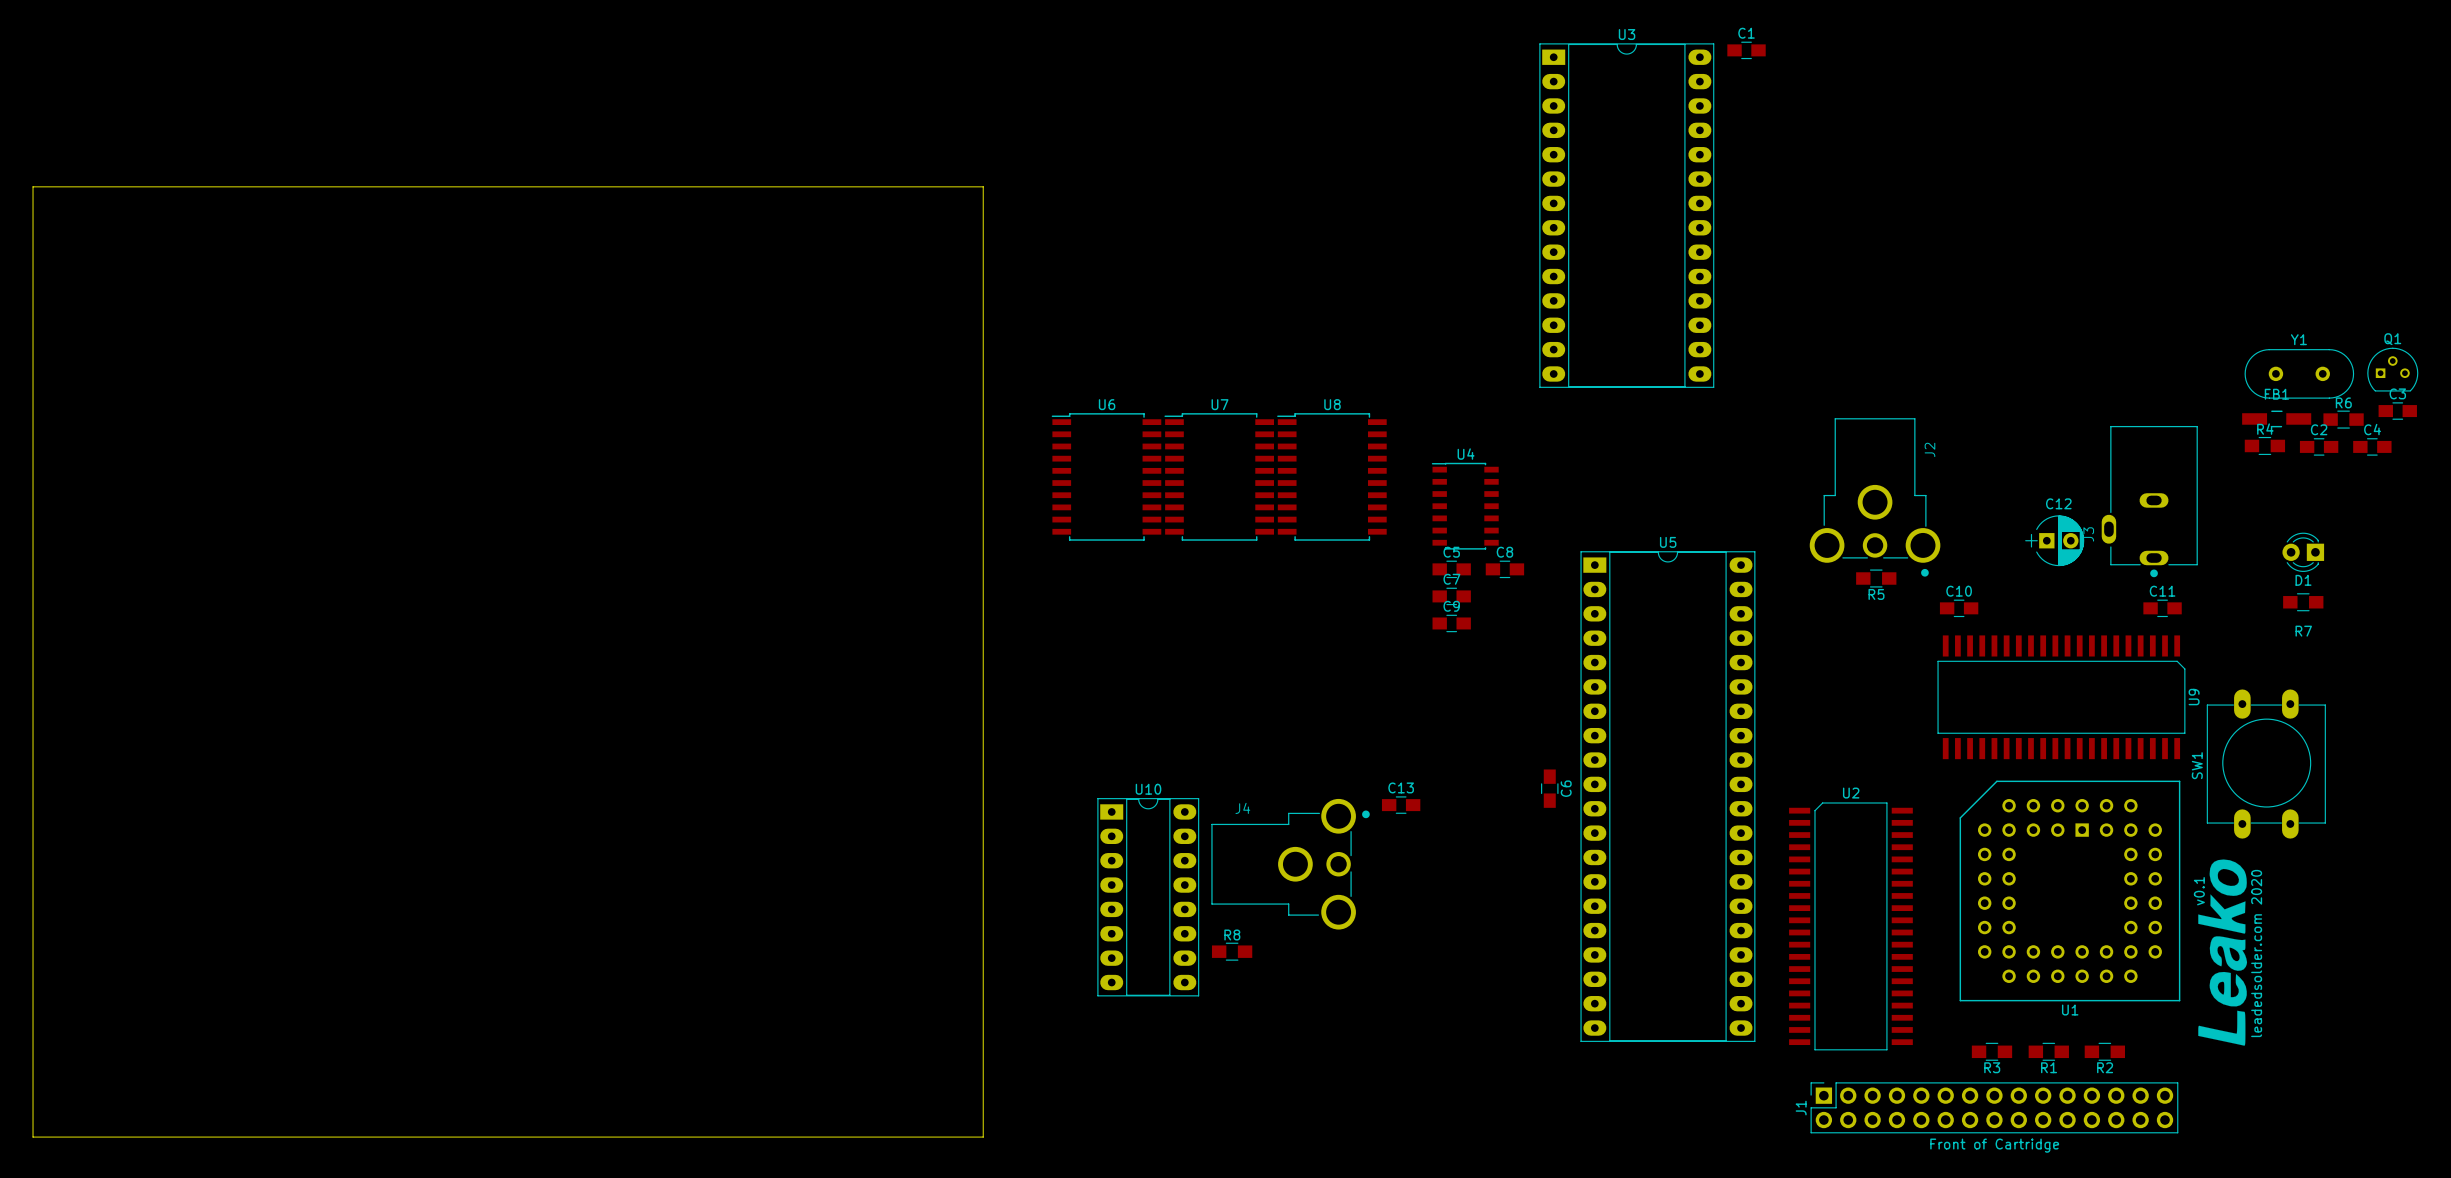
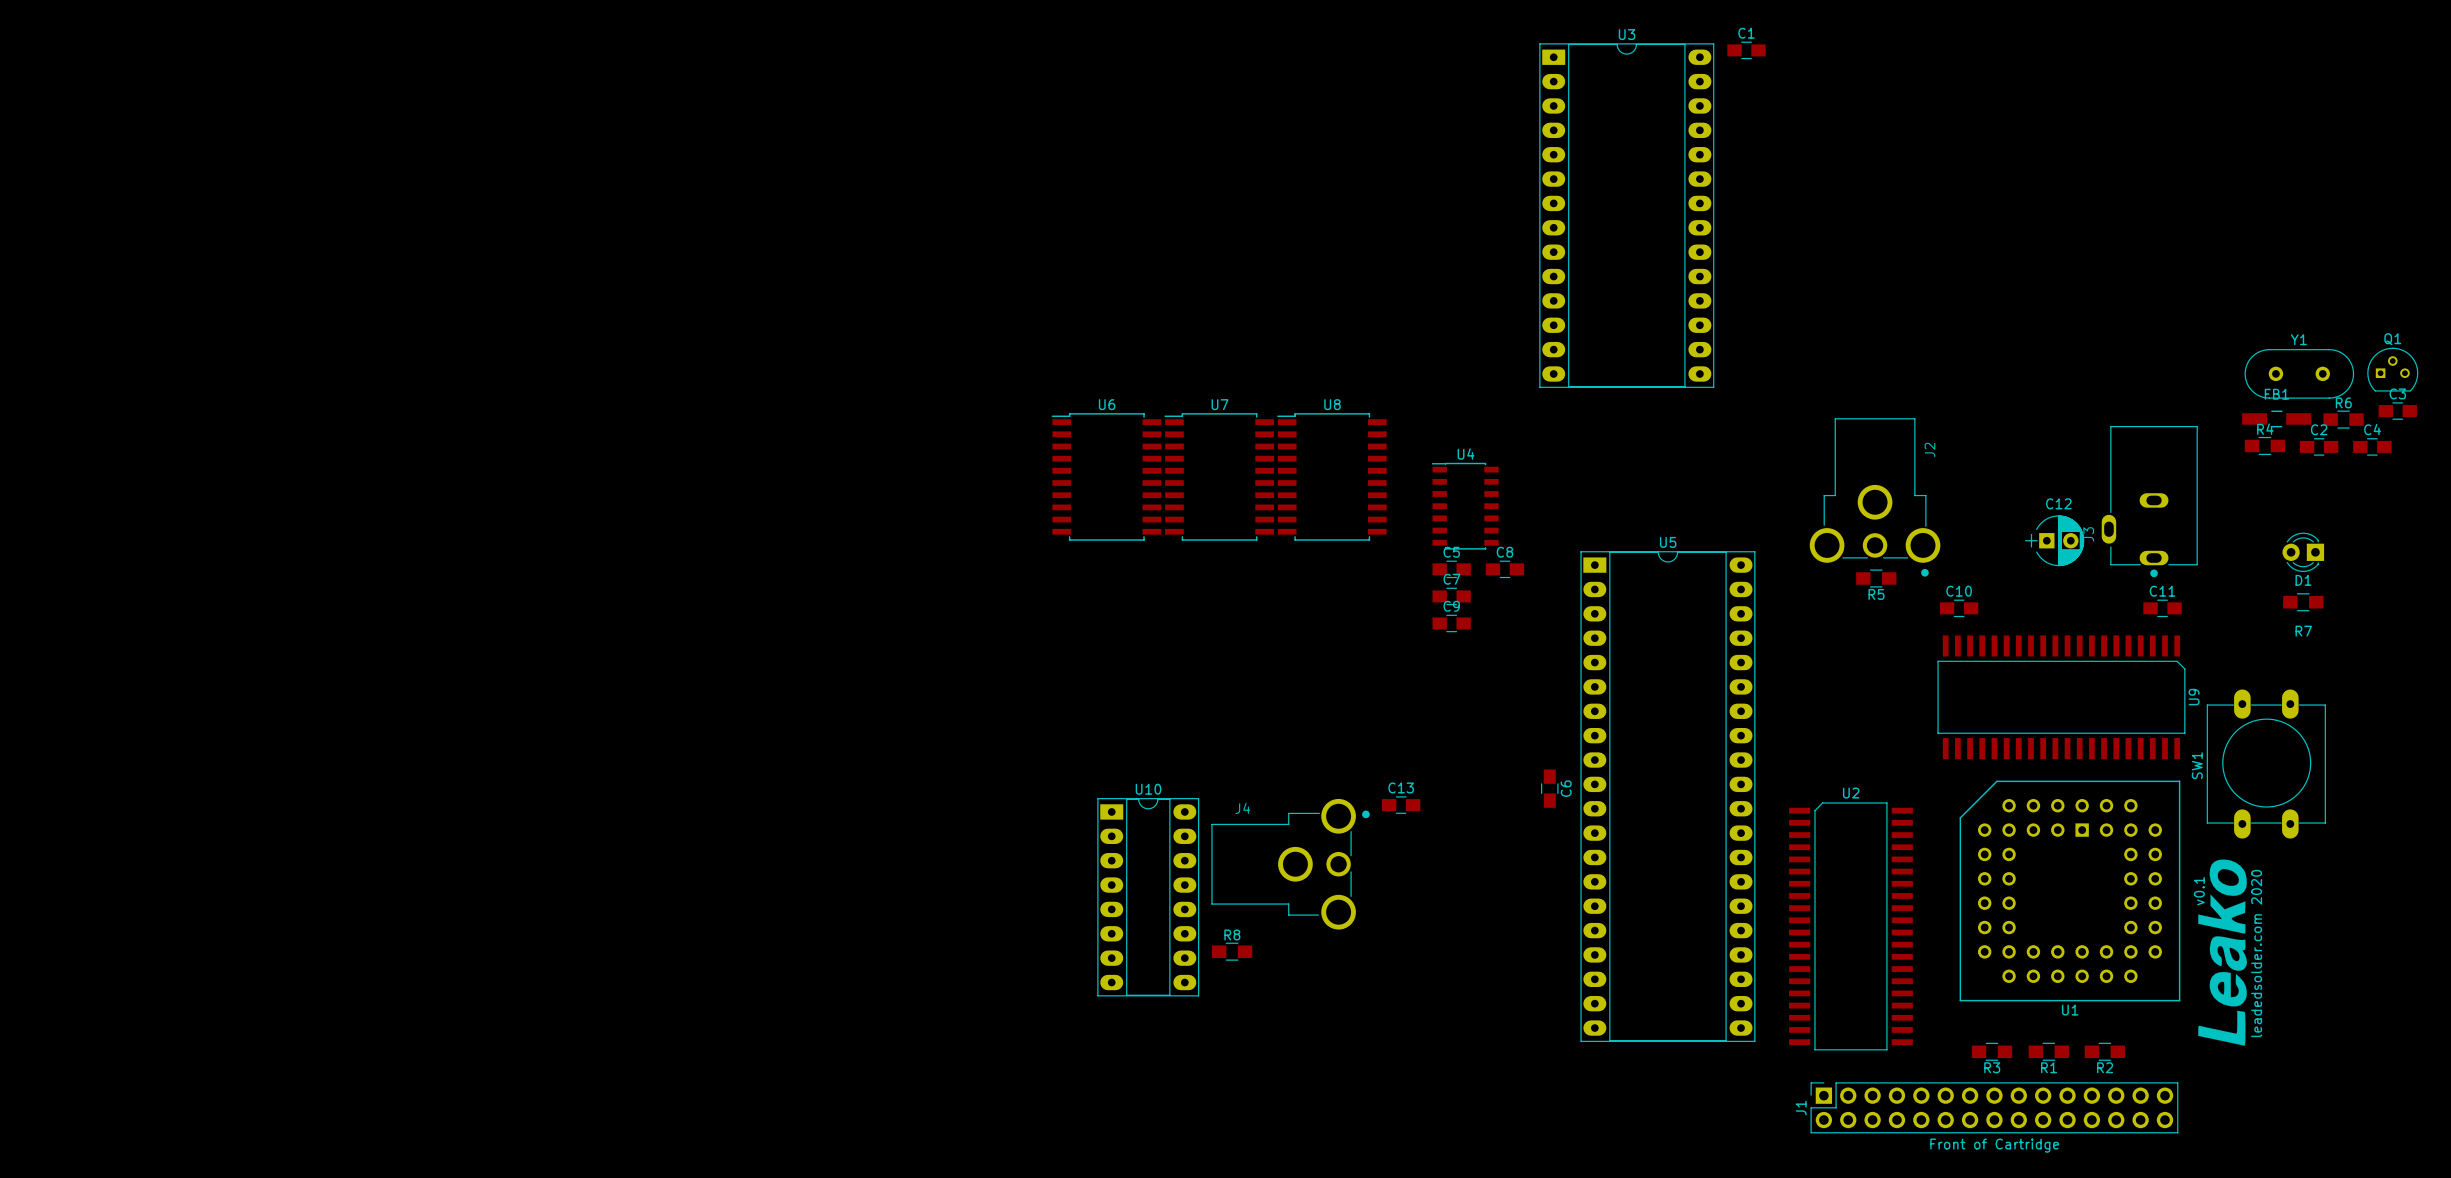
board edge: (33, 186) (983, 186) (983, 1137) (33, 1137) (33, 186) -> none

